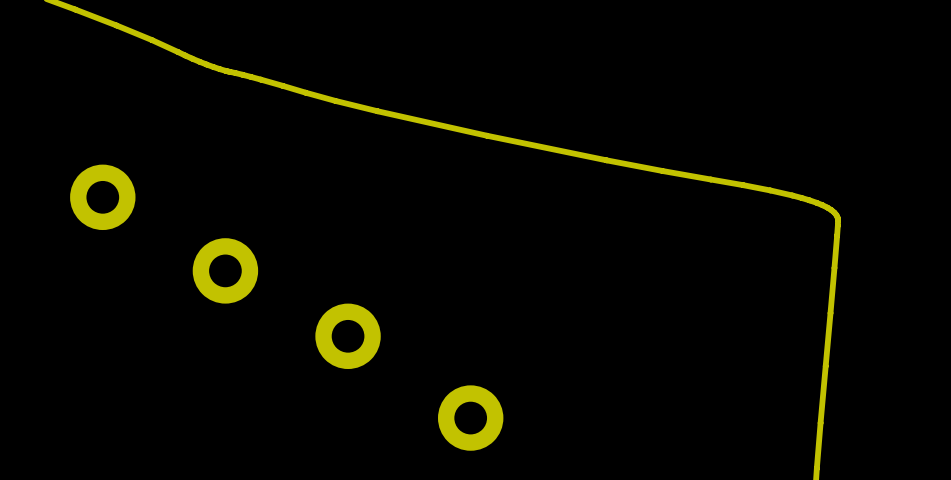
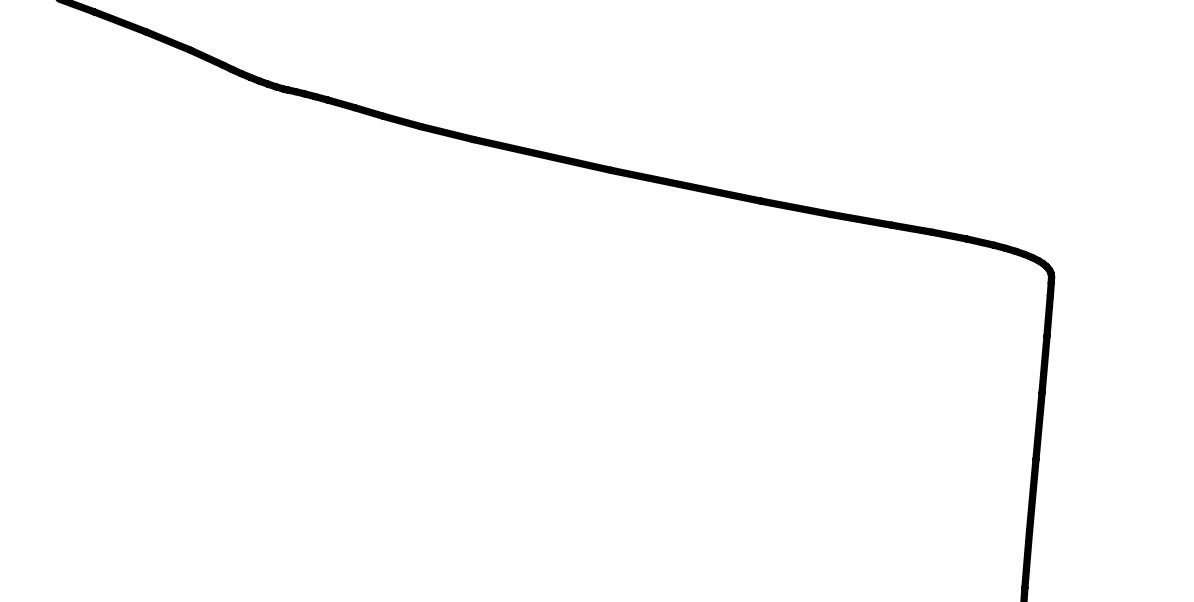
part: (102, 197) -> none
part: (225, 270) -> none
part: (348, 336) -> none
part: (470, 418) -> none

